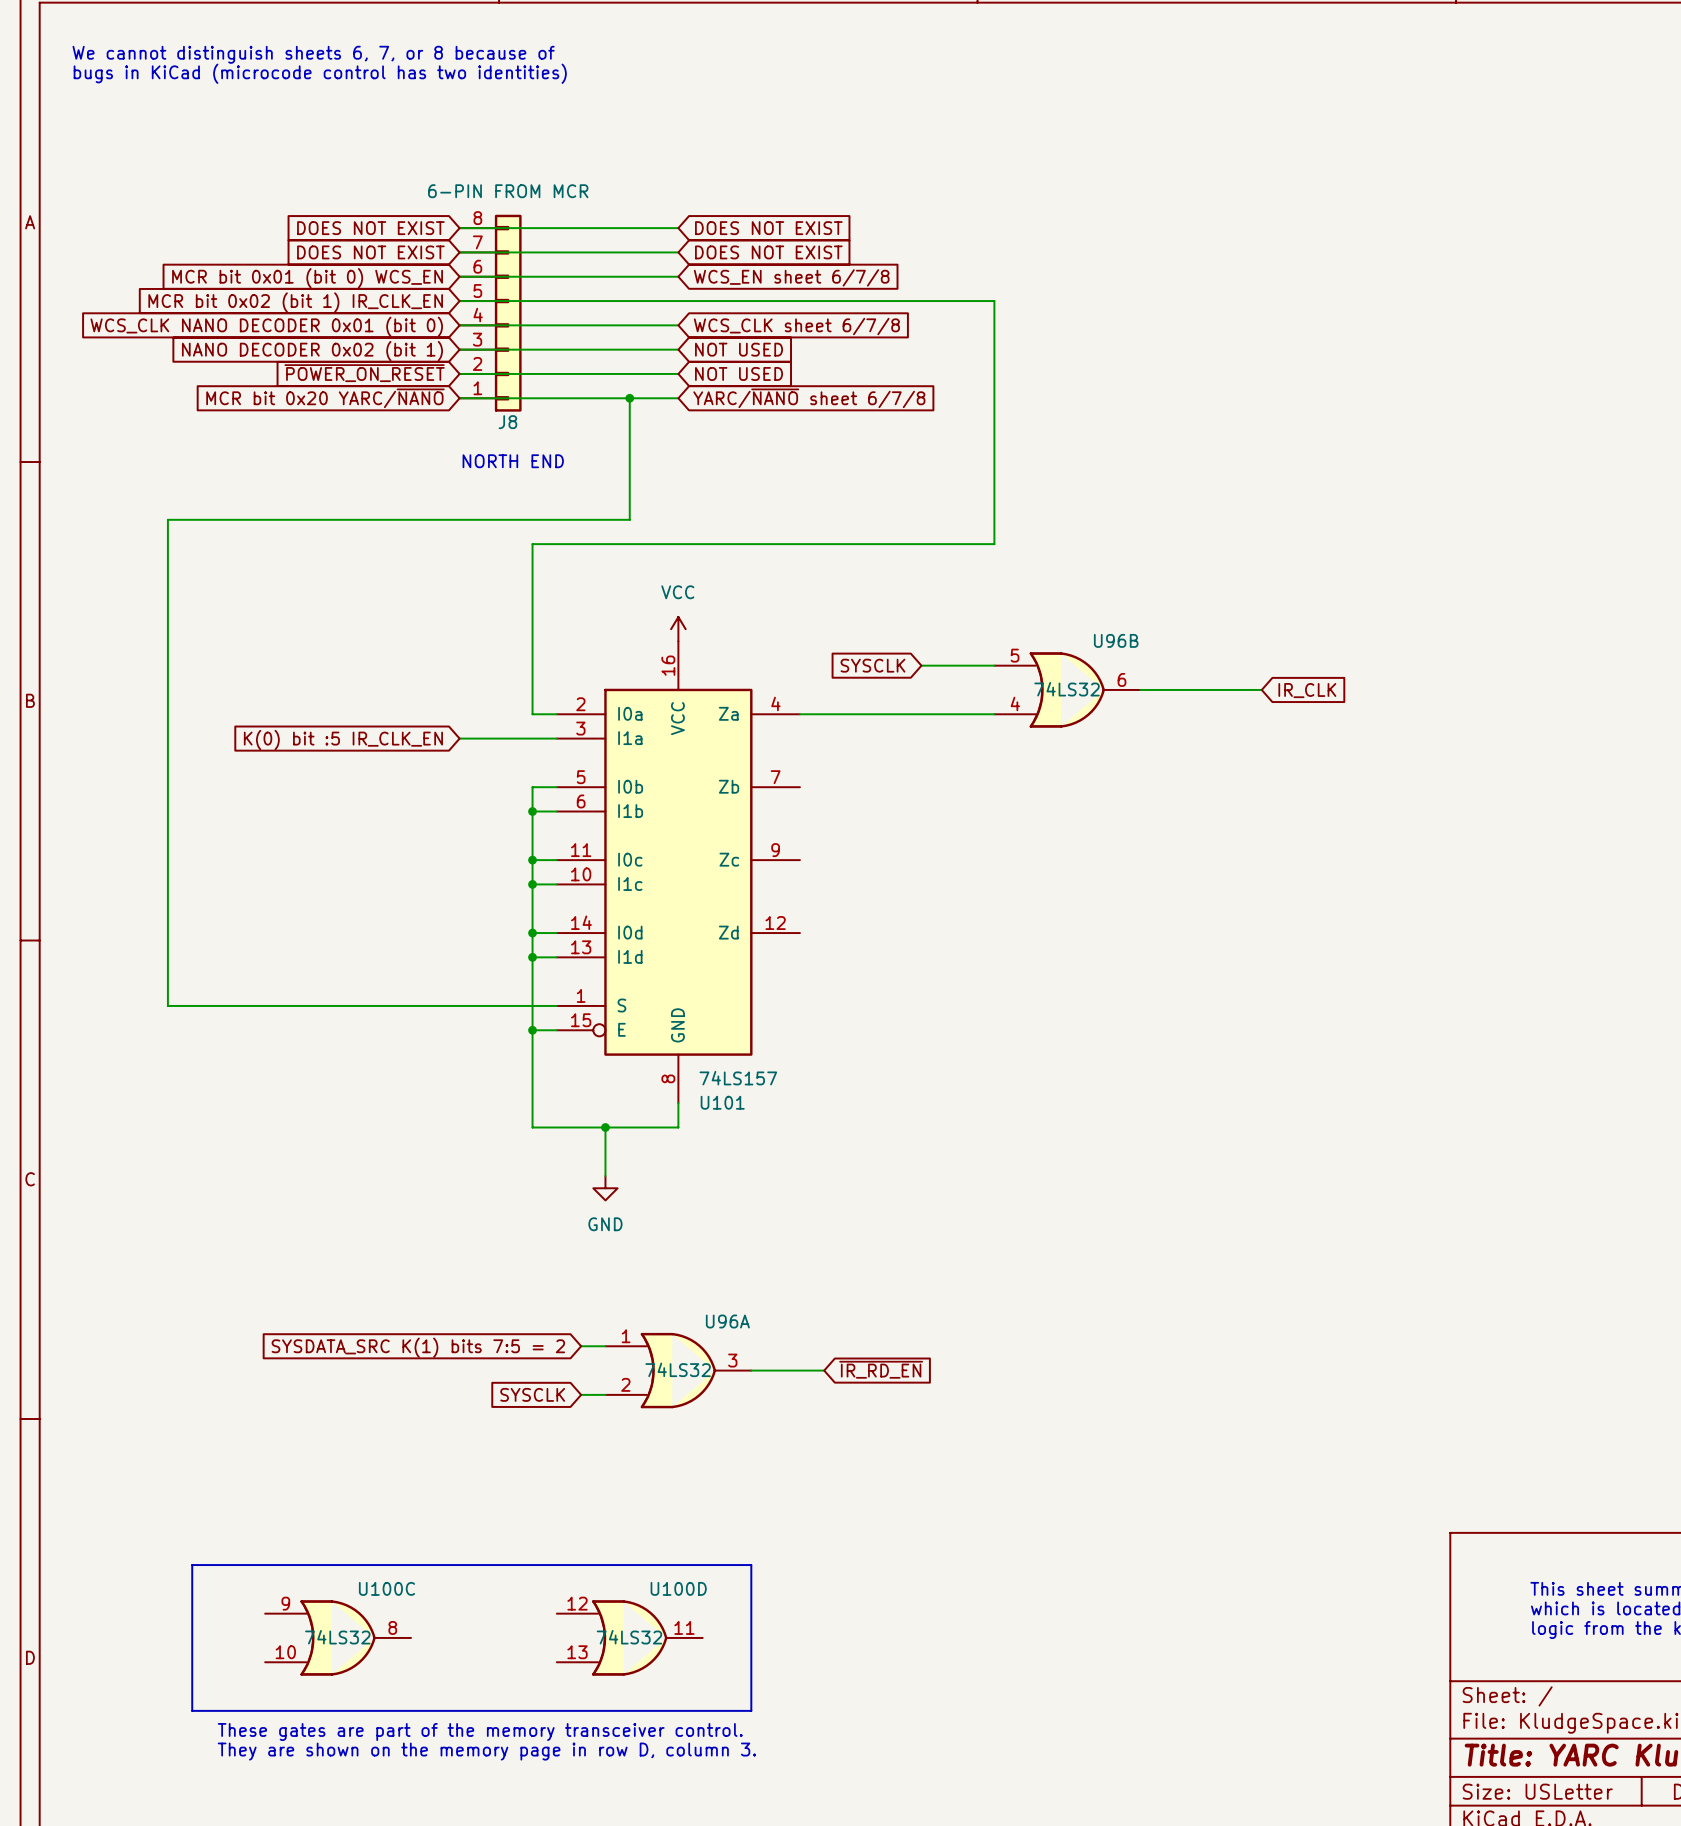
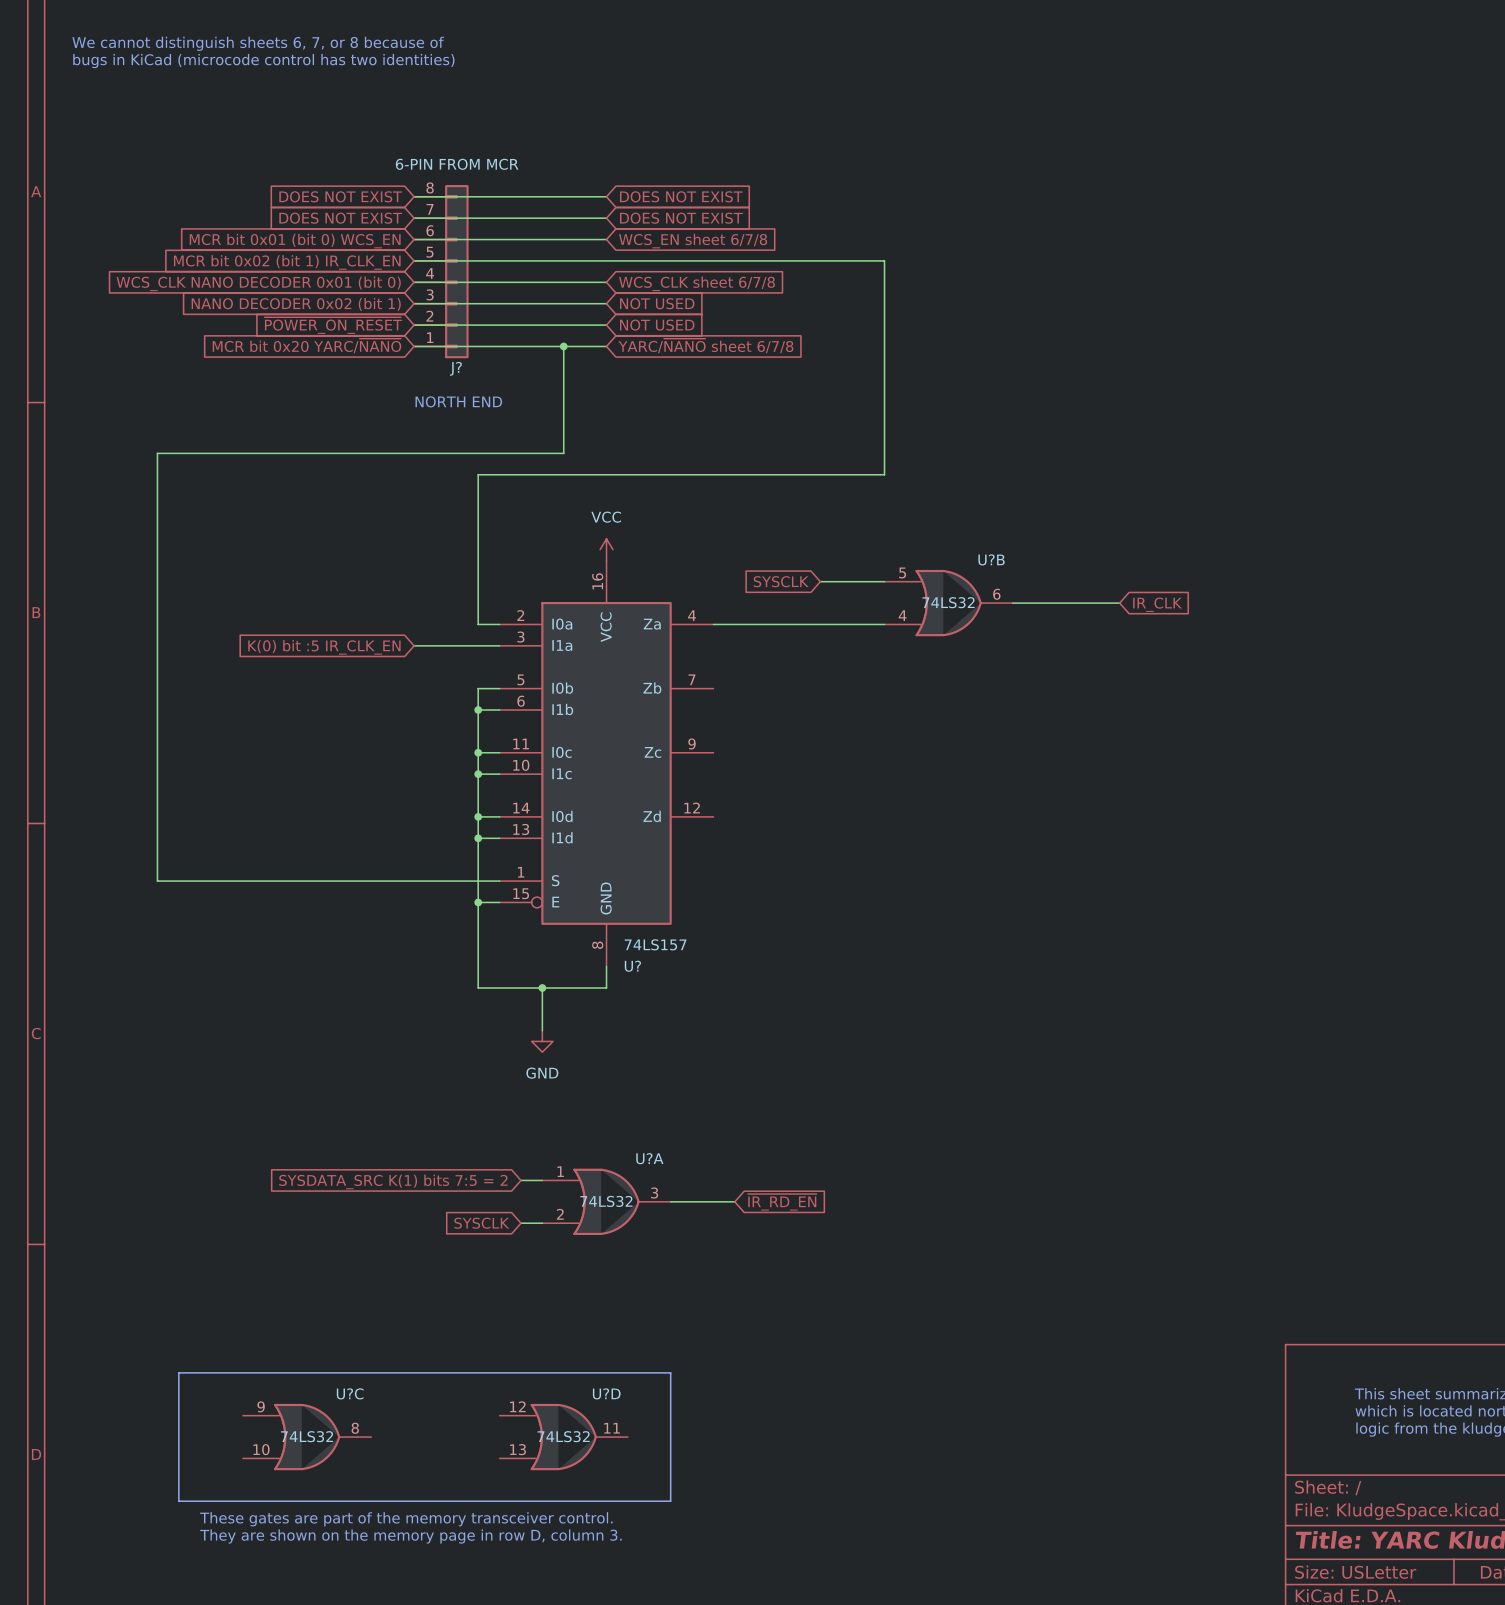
J8 name: J8 (507, 422) -> J? (455, 368)
U96B name: U96B (1116, 640) -> U?B (991, 559)
U101 name: U101 (722, 1102) -> U? (632, 966)
U96A name: U96A (727, 1321) -> U?A (649, 1158)
U100C name: U100C (386, 1588) -> U?C (350, 1393)
U100D name: U100D (678, 1588) -> U?D (606, 1393)

